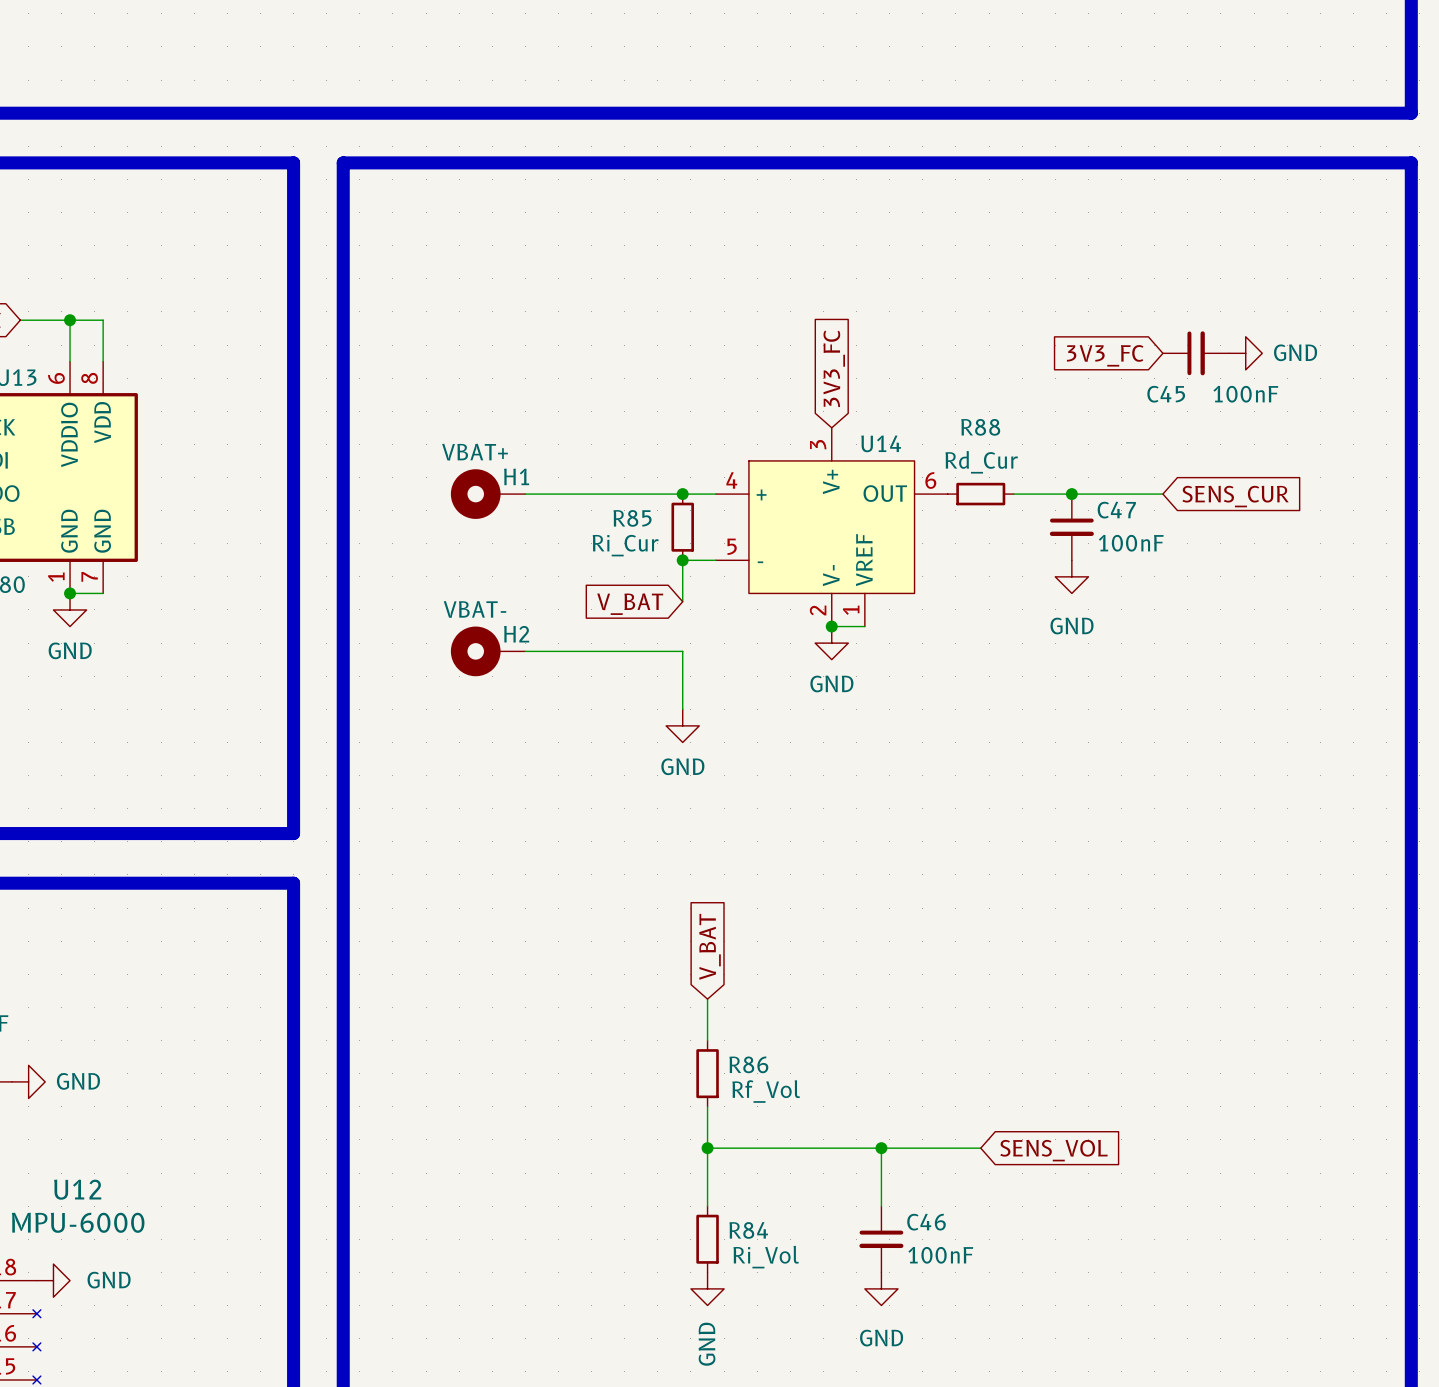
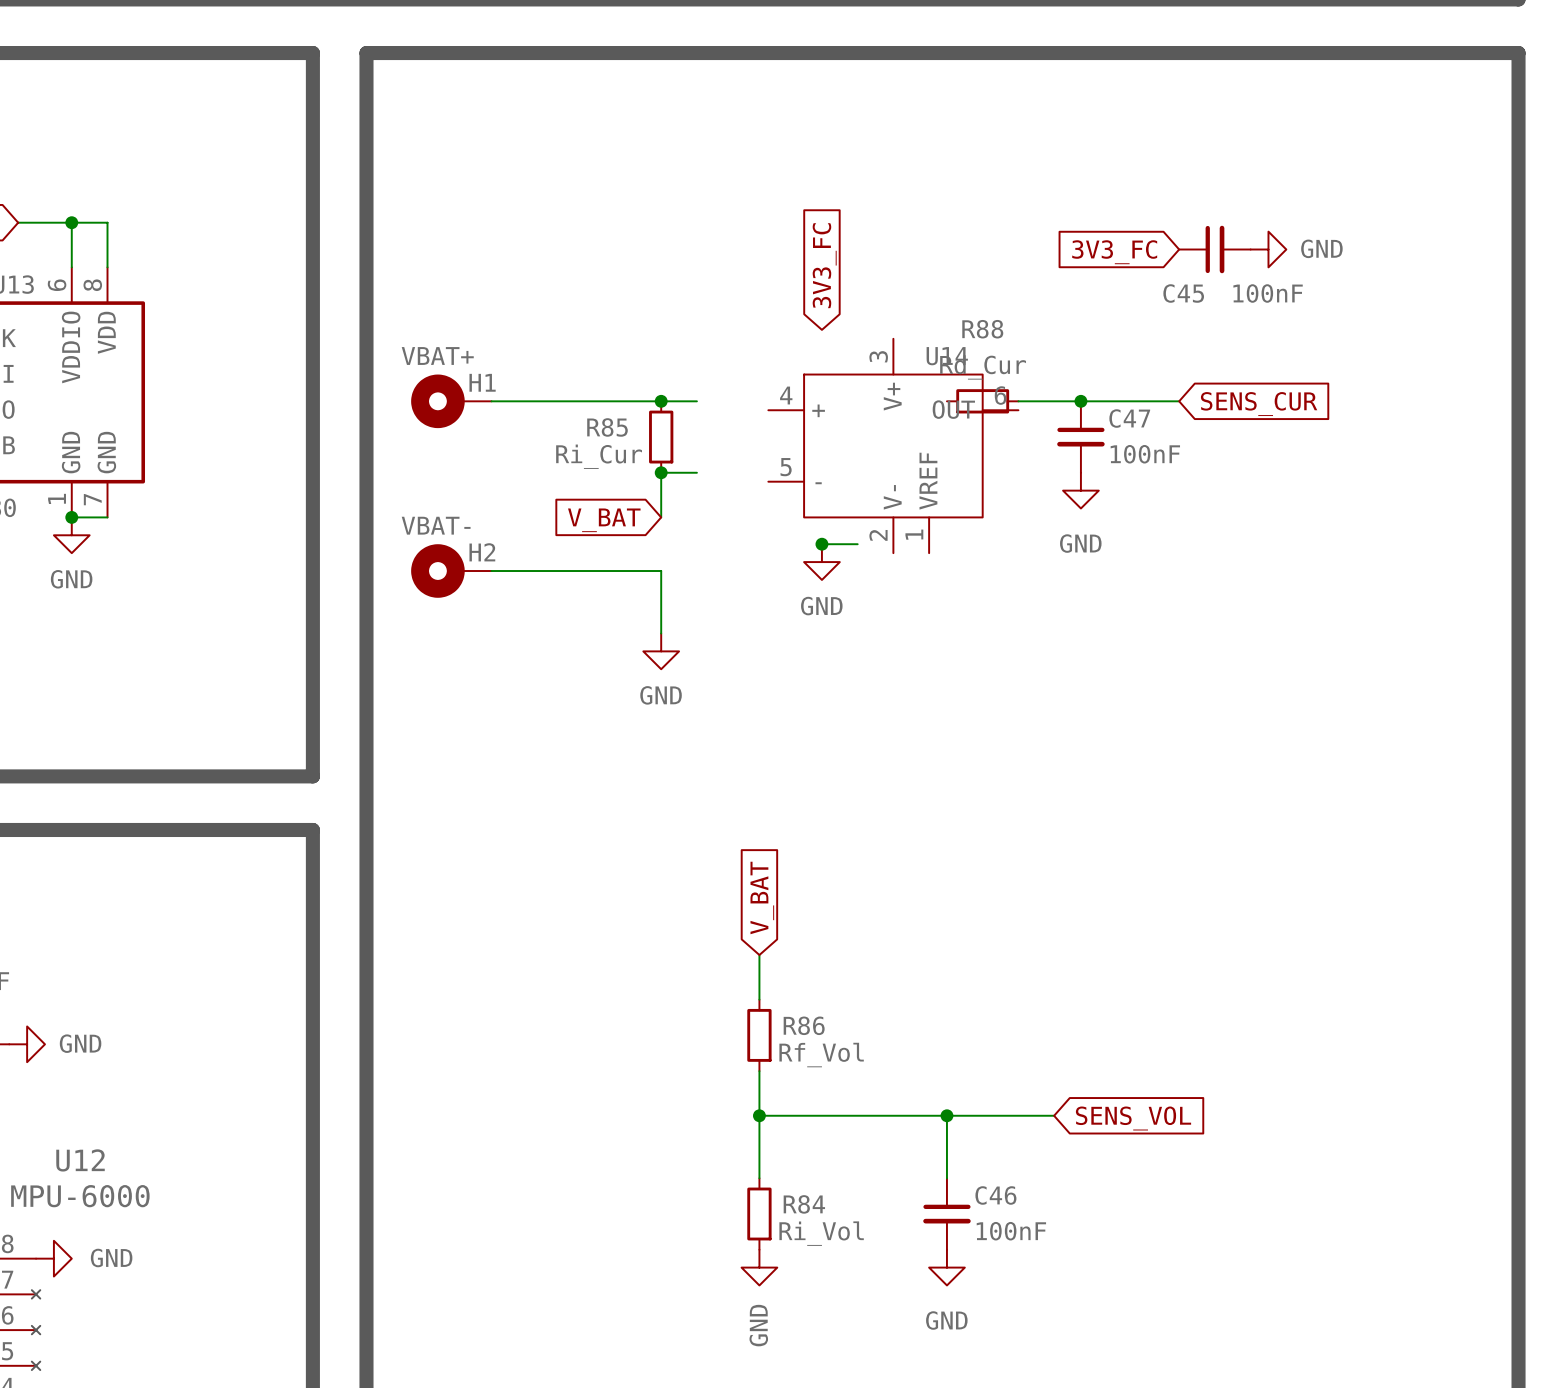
C45 position: (1196, 353) -> (1214, 249)
power symbol position: GND (1245, 353) -> GND (1268, 249)
global label position: 3V3_FC (1105, 355) -> 3V3_FC (1114, 252)
global label position: 3V3_FC (834, 368) -> 3V3_FC (824, 265)
junction: none -> (661, 401)
H1 position: (488, 494) -> (451, 401)
wire: (525, 494) (715, 494) -> (491, 401) (696, 401)
junction: (682, 494) -> none
R88 position: (980, 494) -> (982, 401)
wire: (1013, 494) (1162, 494) -> (1018, 401) (1179, 401)
junction position: (1071, 494) -> (1080, 401)
global label position: SENS_CUR (1235, 496) -> SENS_CUR (1259, 404)
R85 position: (682, 527) -> (661, 437)
C47 position: (1071, 527) -> (1080, 437)
junction: none -> (661, 472)
junction: (682, 560) -> none
wire: (715, 560) (682, 560) (682, 601) -> (696, 472) (661, 472) (661, 517)
power symbol position: GND (1071, 576) -> GND (1080, 490)
global label position: V_BAT (630, 604) -> V_BAT (604, 520)
junction: none -> (821, 544)
wire: (831, 626) (864, 626) -> (821, 544) (857, 544)
junction: (831, 626) -> none
power symbol: none -> GND (821, 562)
power symbol: GND (831, 643) -> none
H2 position: (488, 651) -> (451, 571)
wire: (525, 651) (682, 651) (682, 709) -> (491, 571) (661, 571) (661, 633)
power symbol: none -> GND (661, 651)
power symbol: GND (682, 725) -> none

